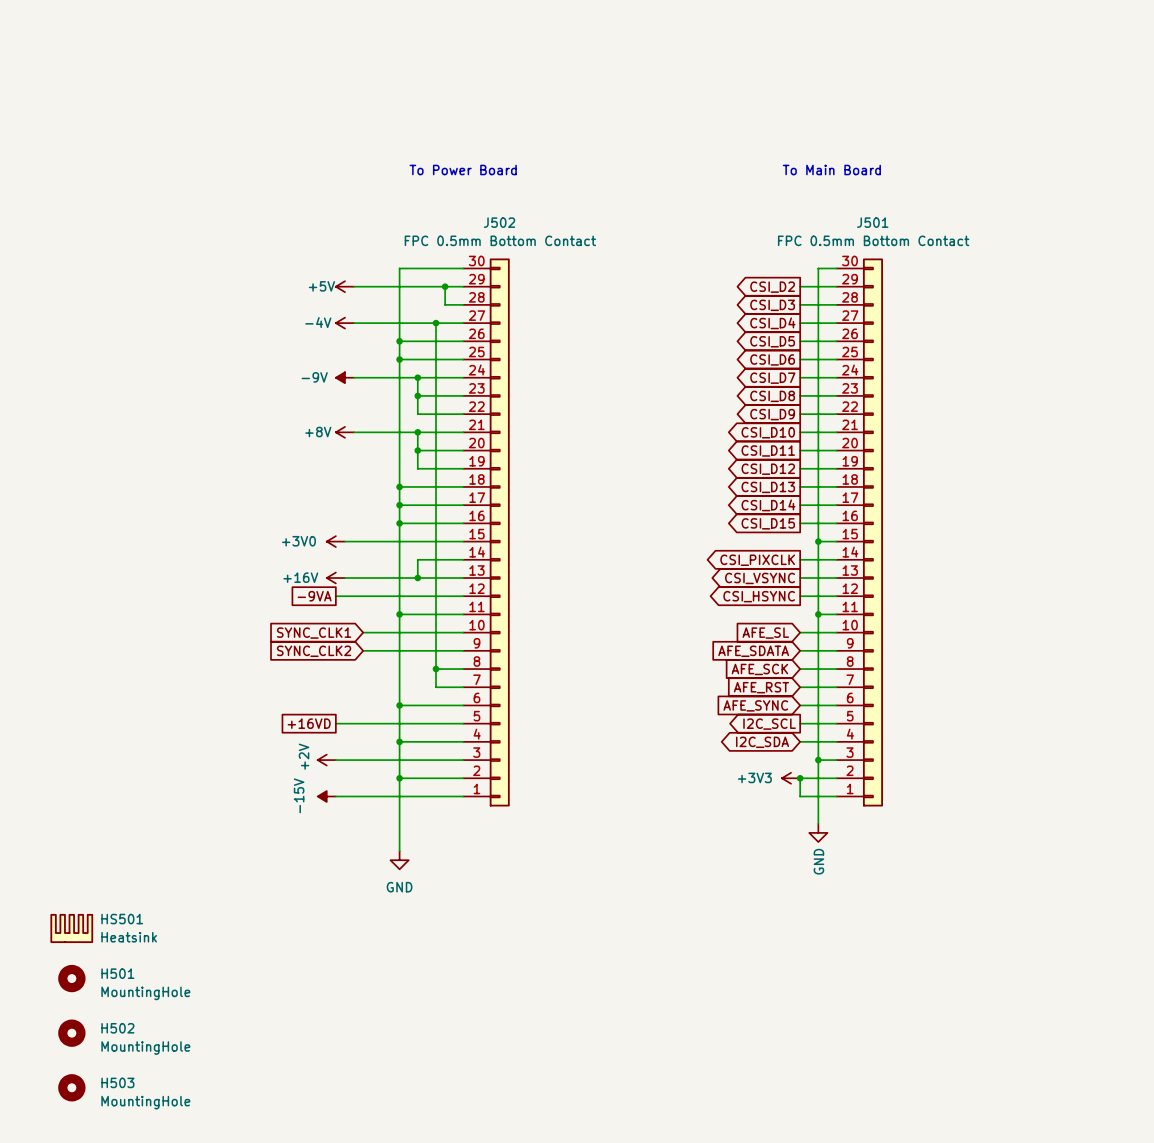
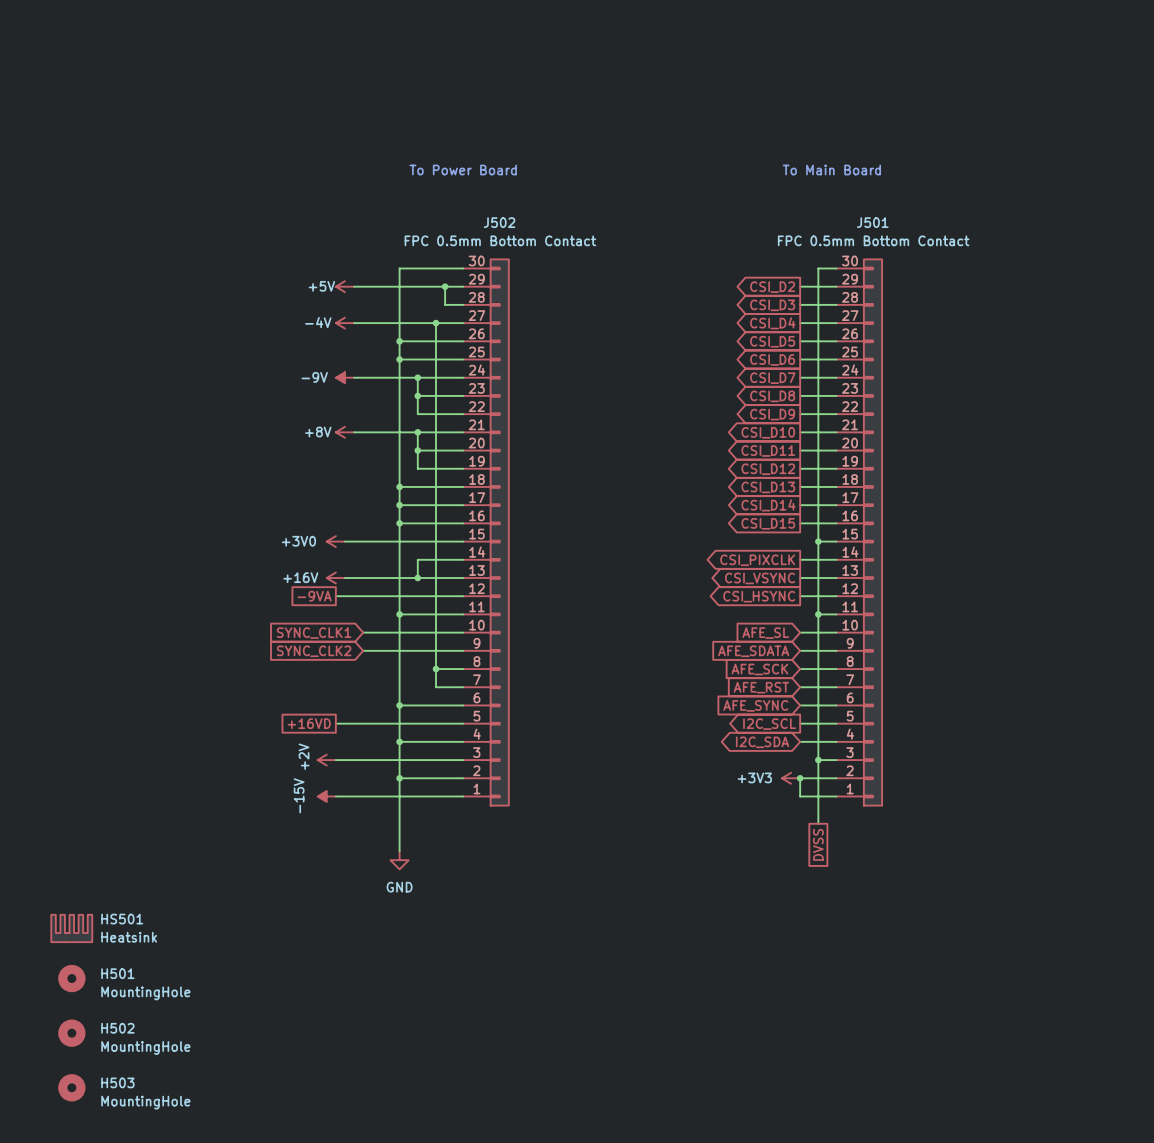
power symbol: GND (818, 832) -> none
global label: none -> DVSS (818, 844)

